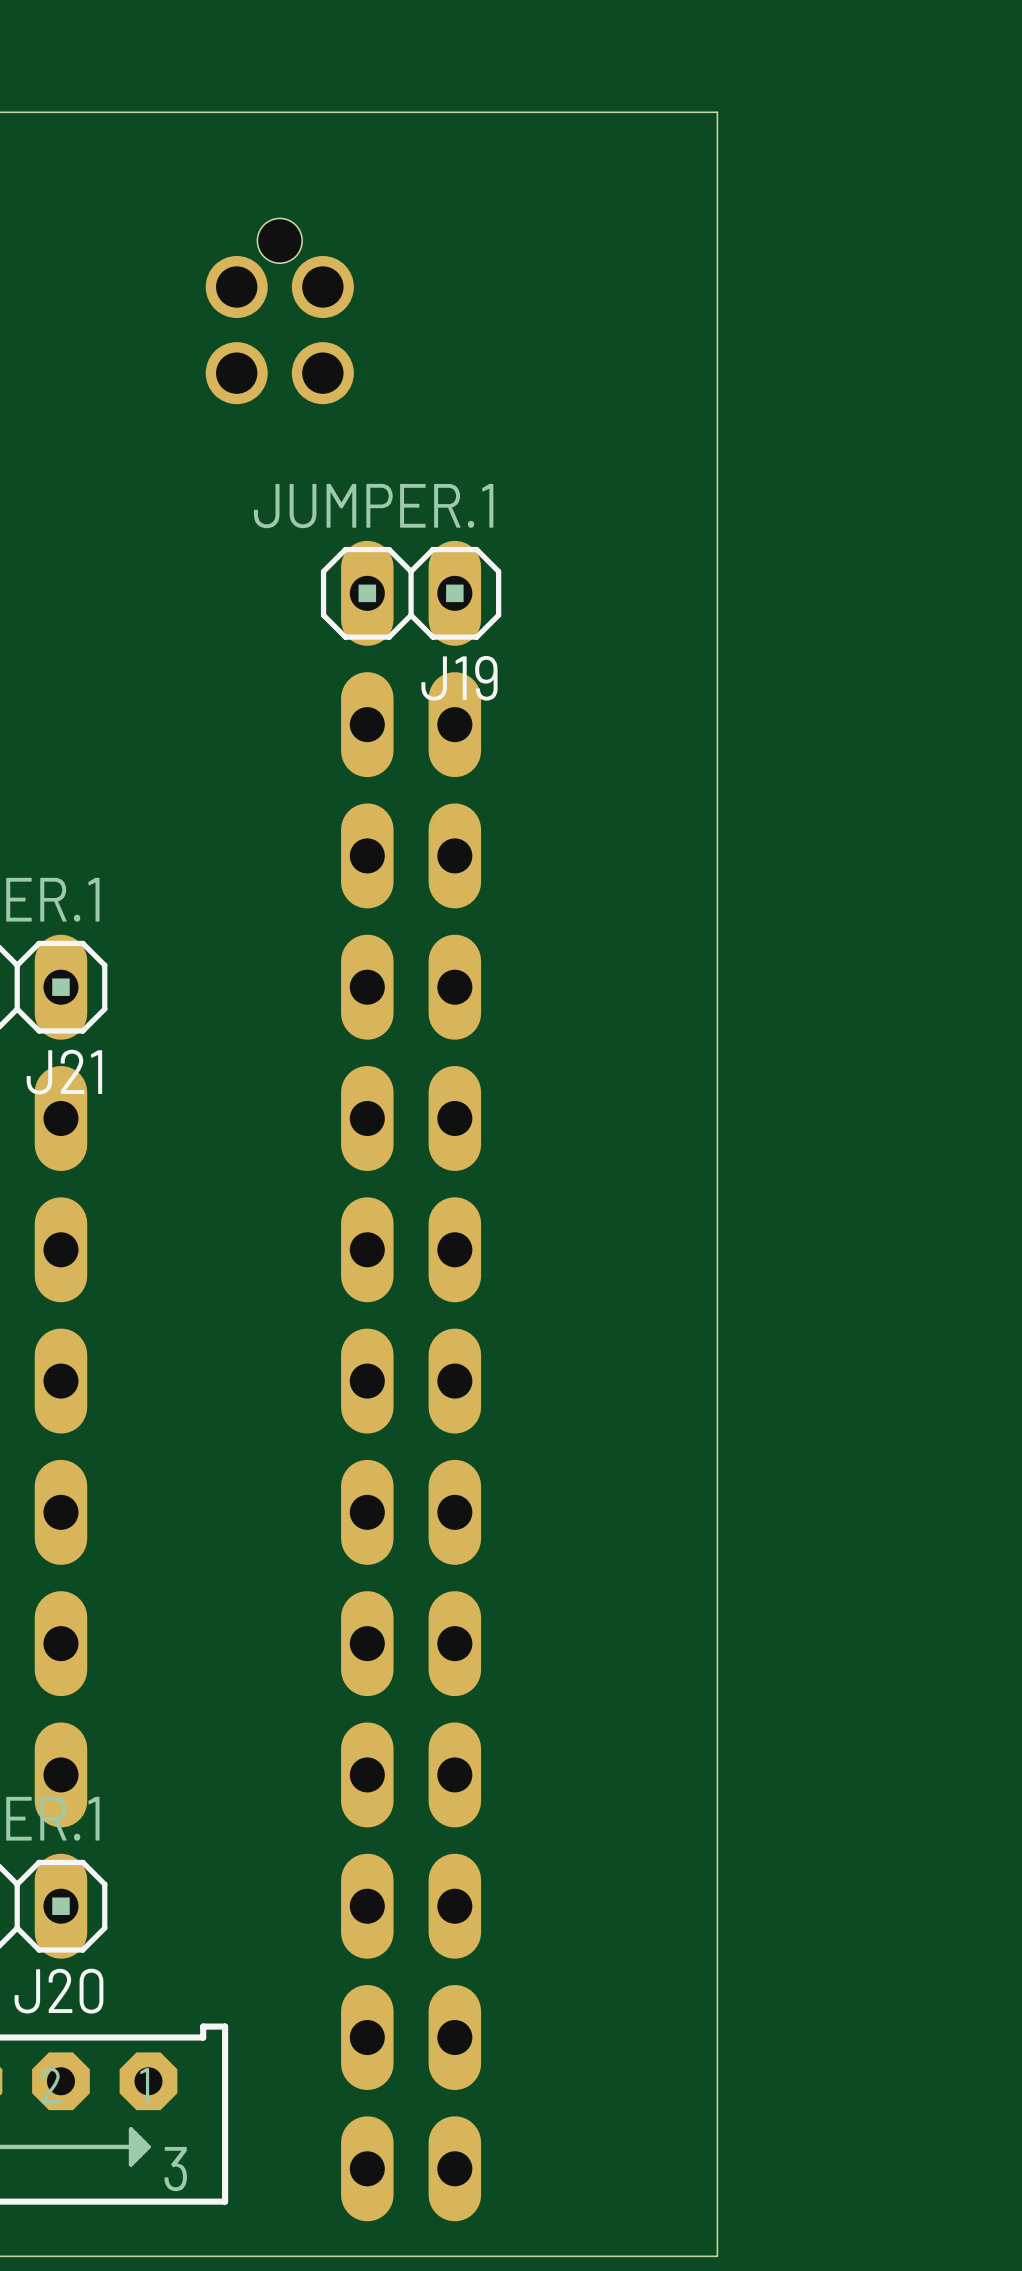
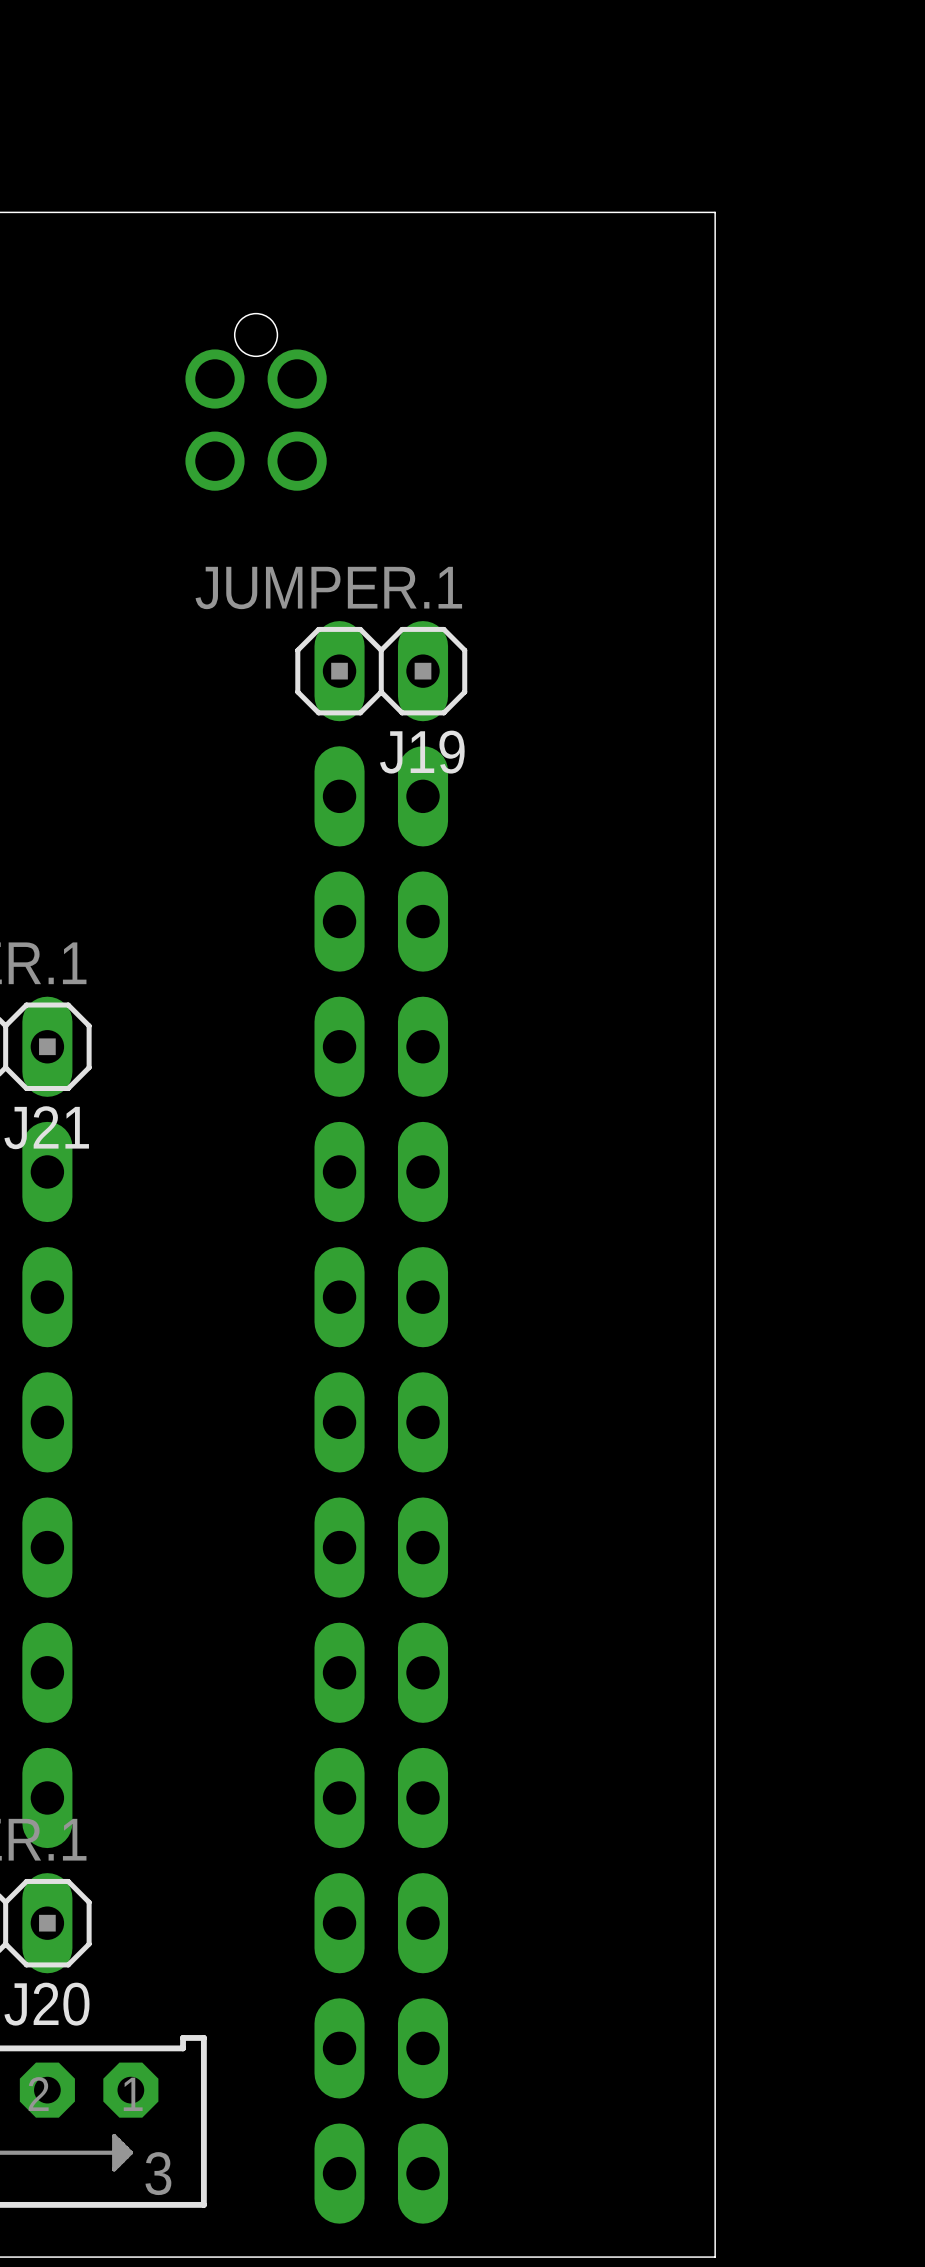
board edge: (717, 112) (717, 2256) -> (673, 212) (715, 212) (715, 2257) (673, 2257)

